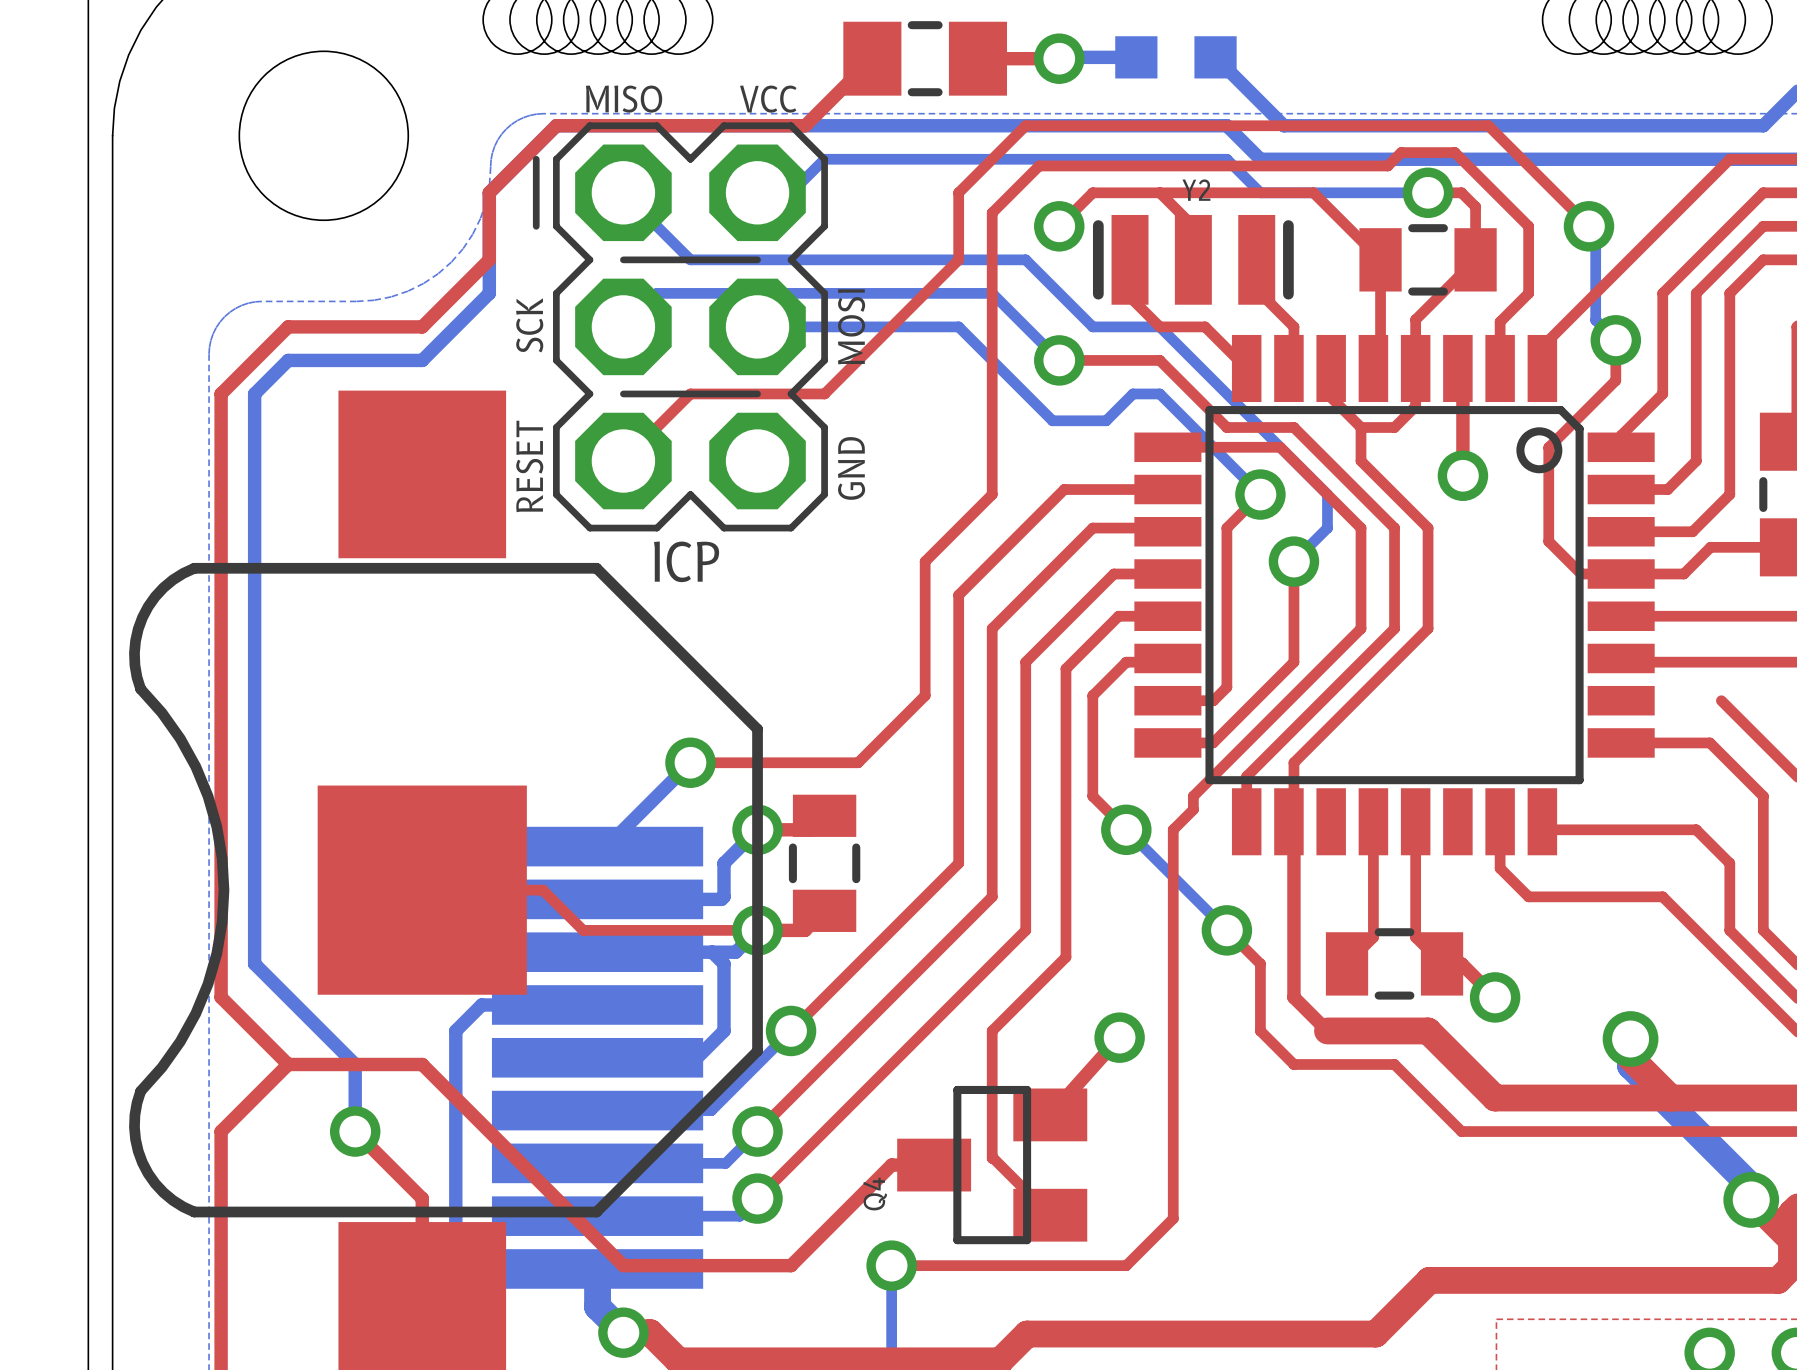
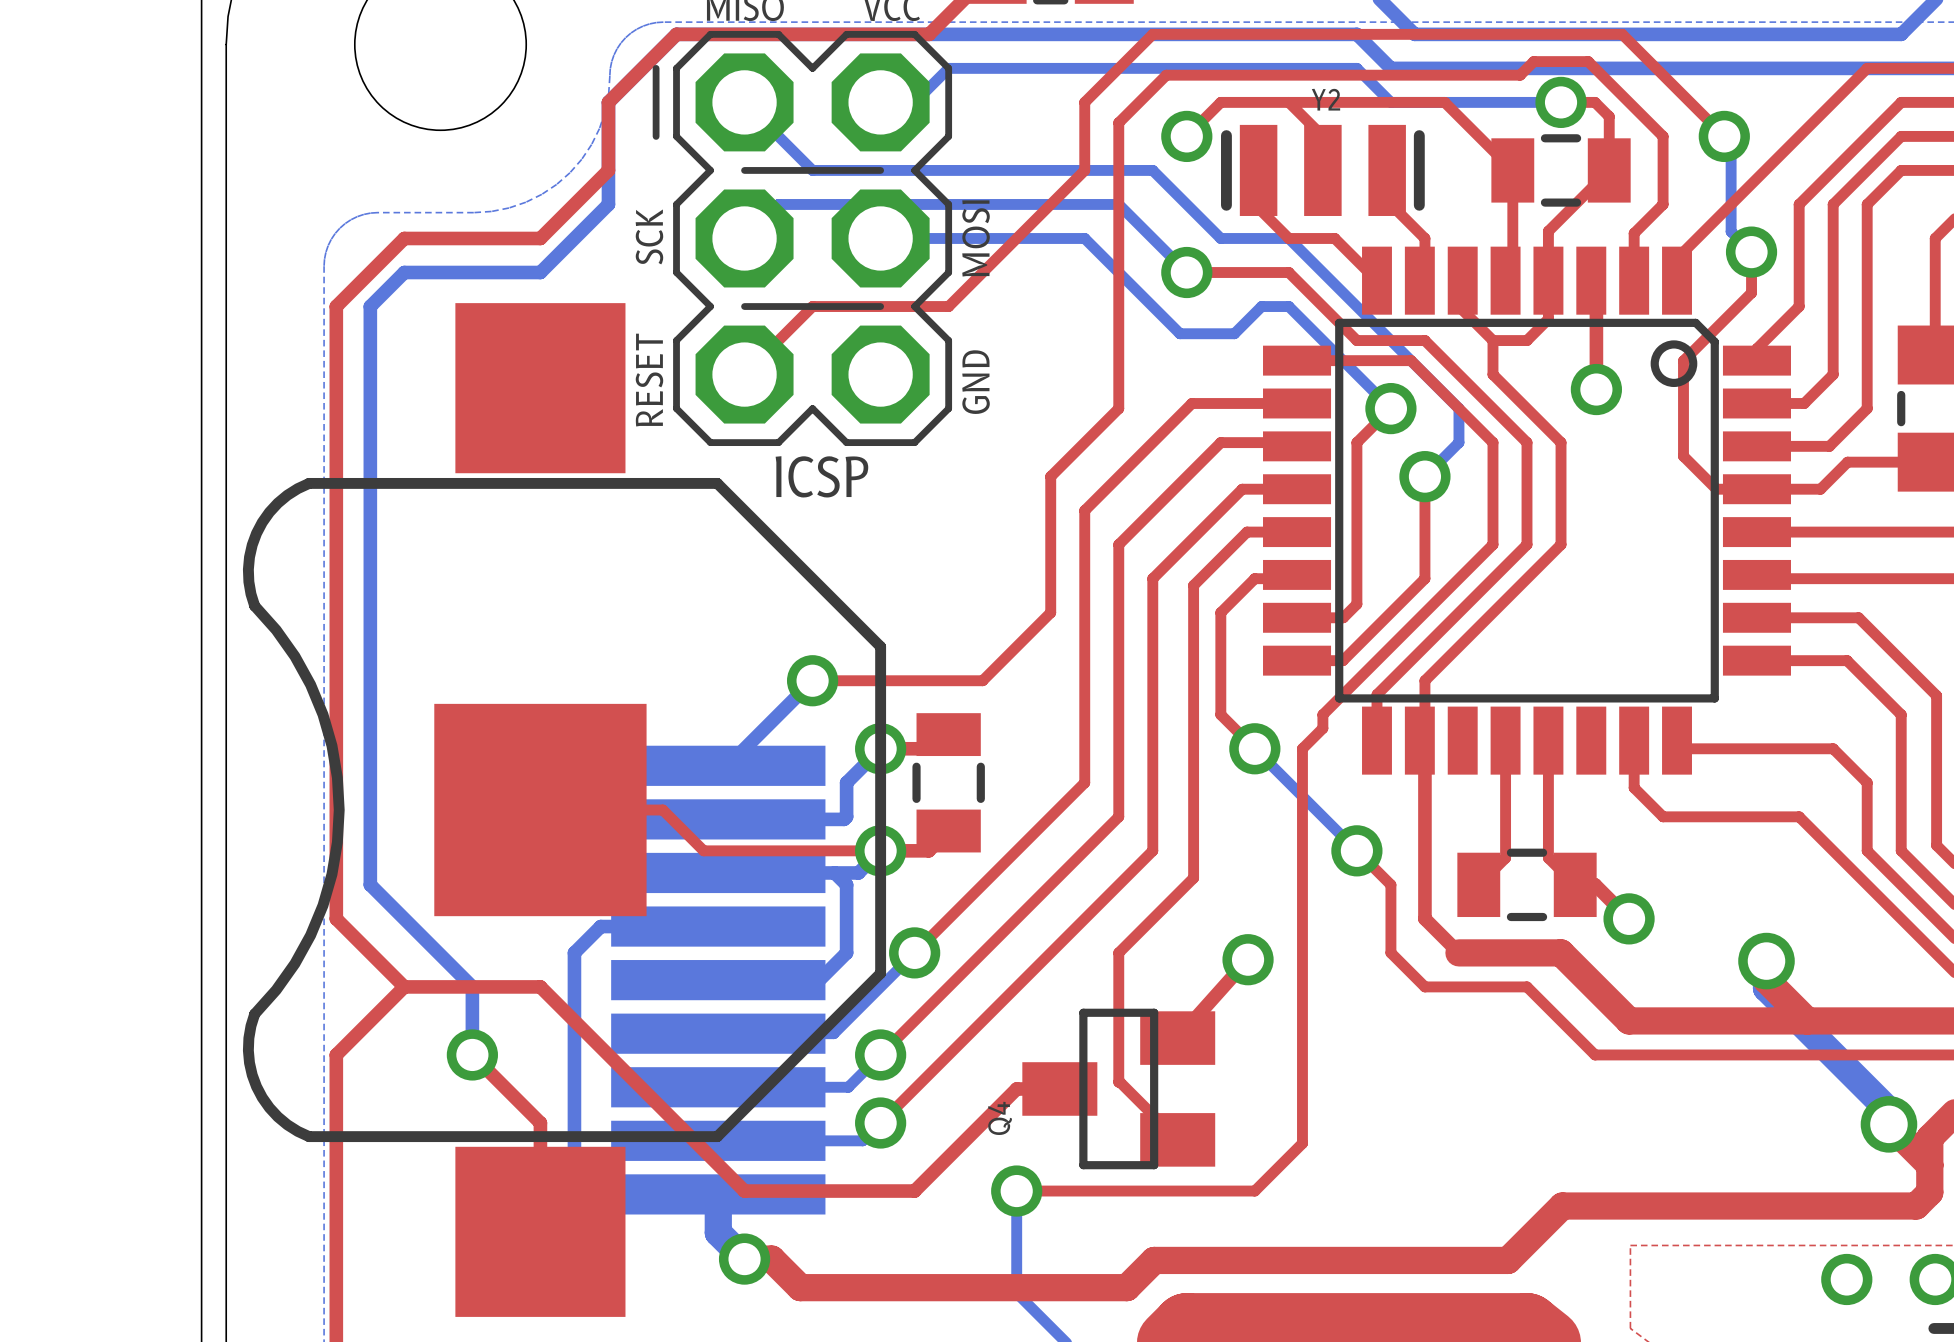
ICP name: ICP (686, 561) -> ICSP (821, 476)
top track: none -> (1756, 617) (1858, 617)

